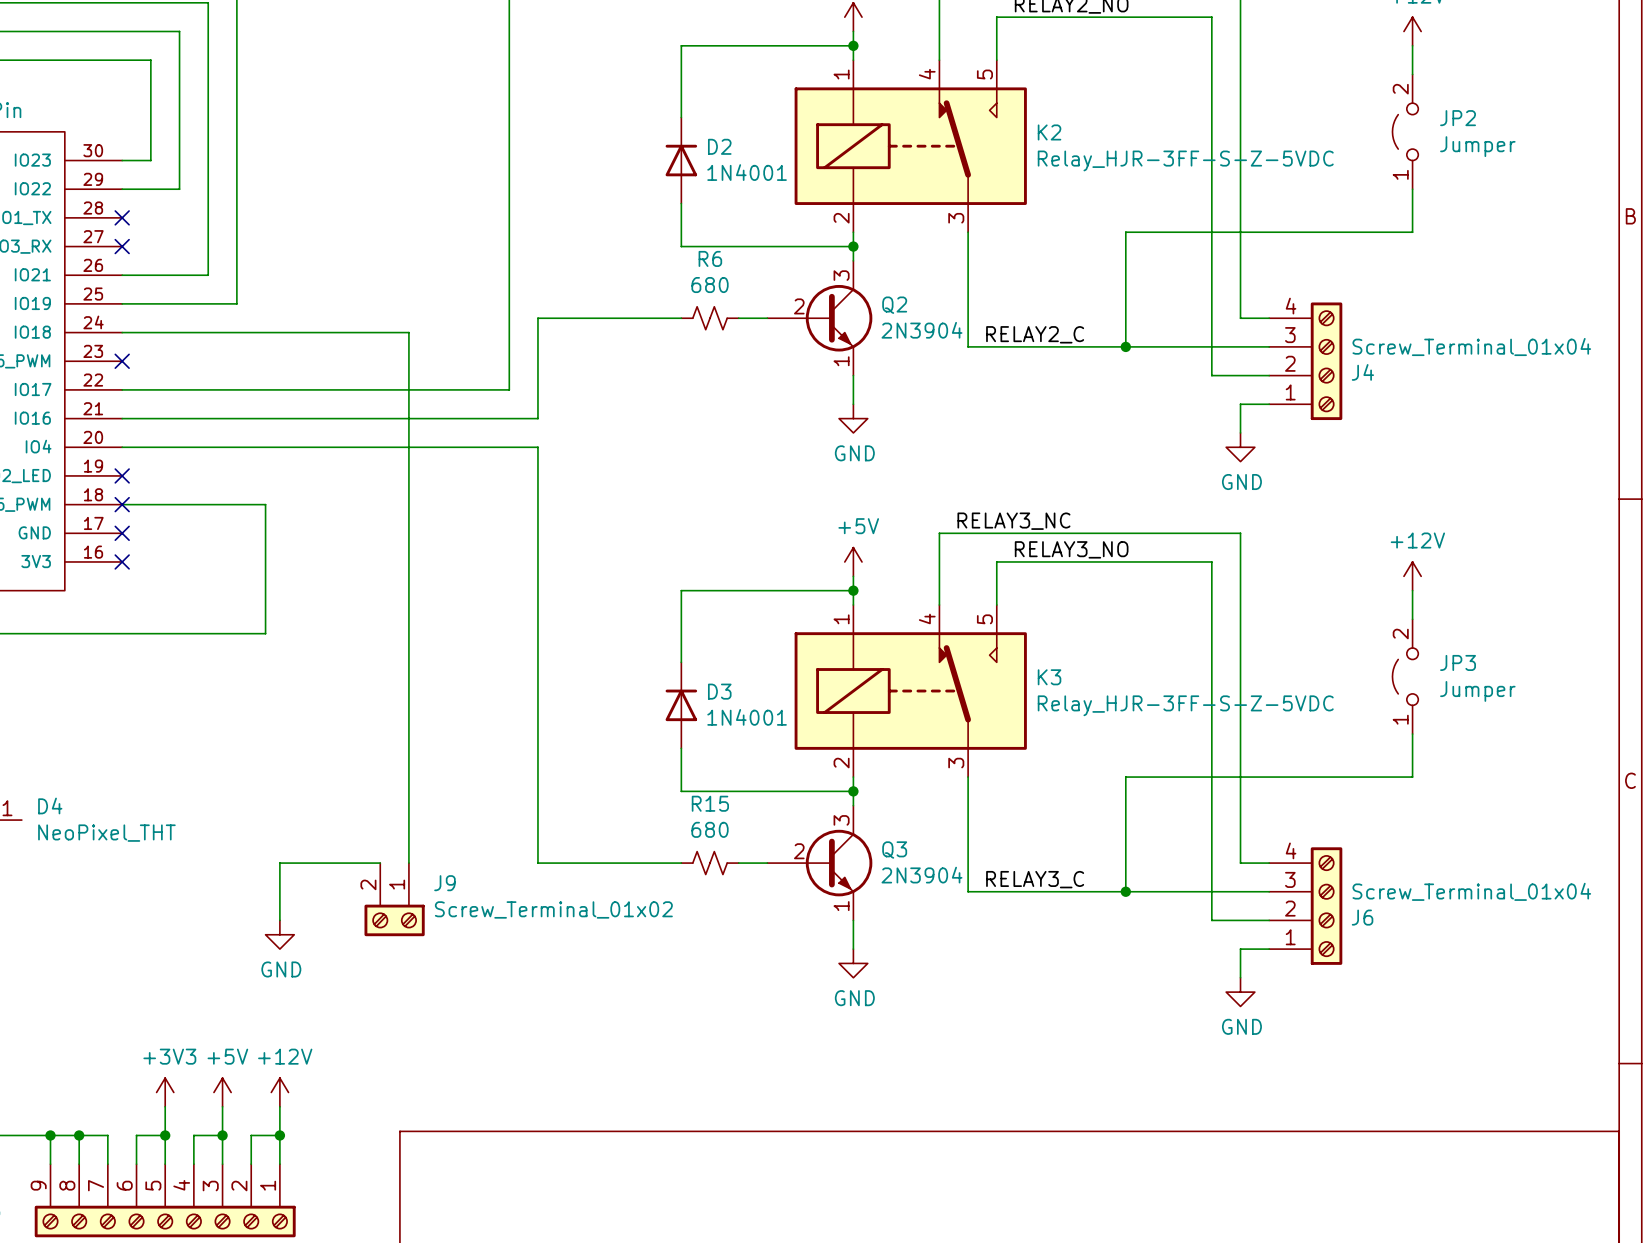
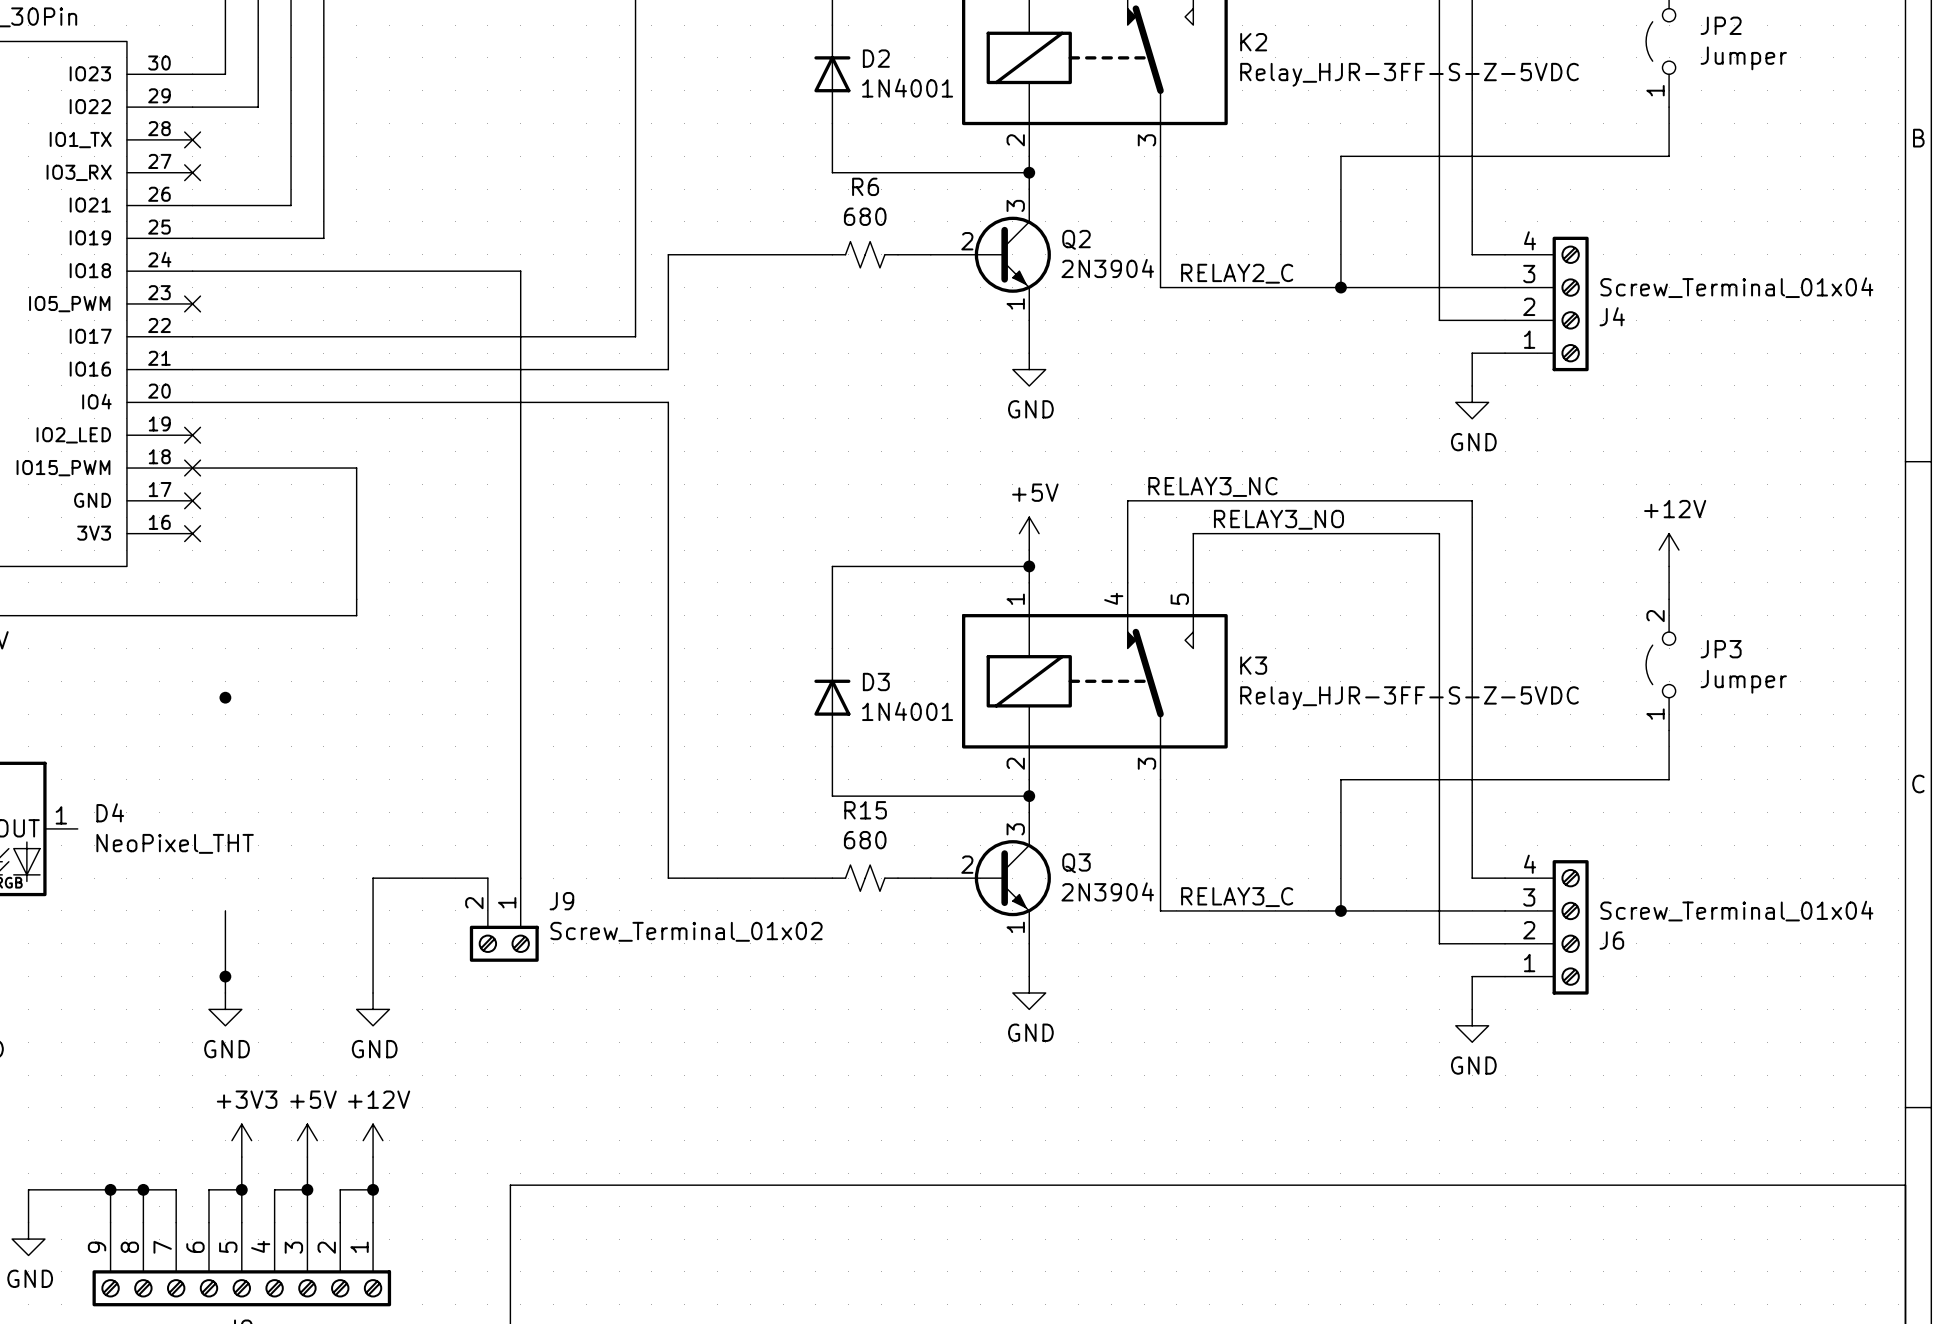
junction: none -> (225, 697)
wire: none -> (225, 910) (225, 992)
wire: none -> (373, 943) (373, 992)
power symbol position: GND (279, 934) -> GND (373, 1009)
junction: none -> (225, 976)
power symbol: none -> GND (225, 1009)

